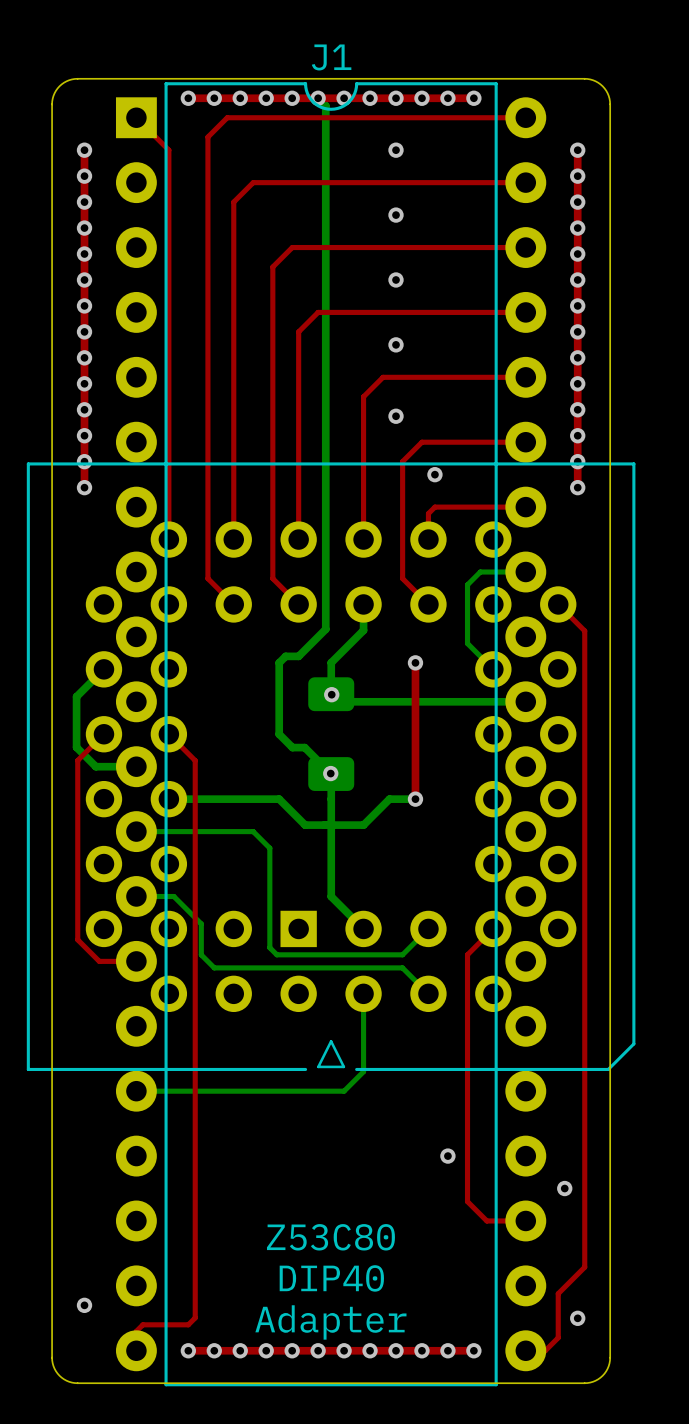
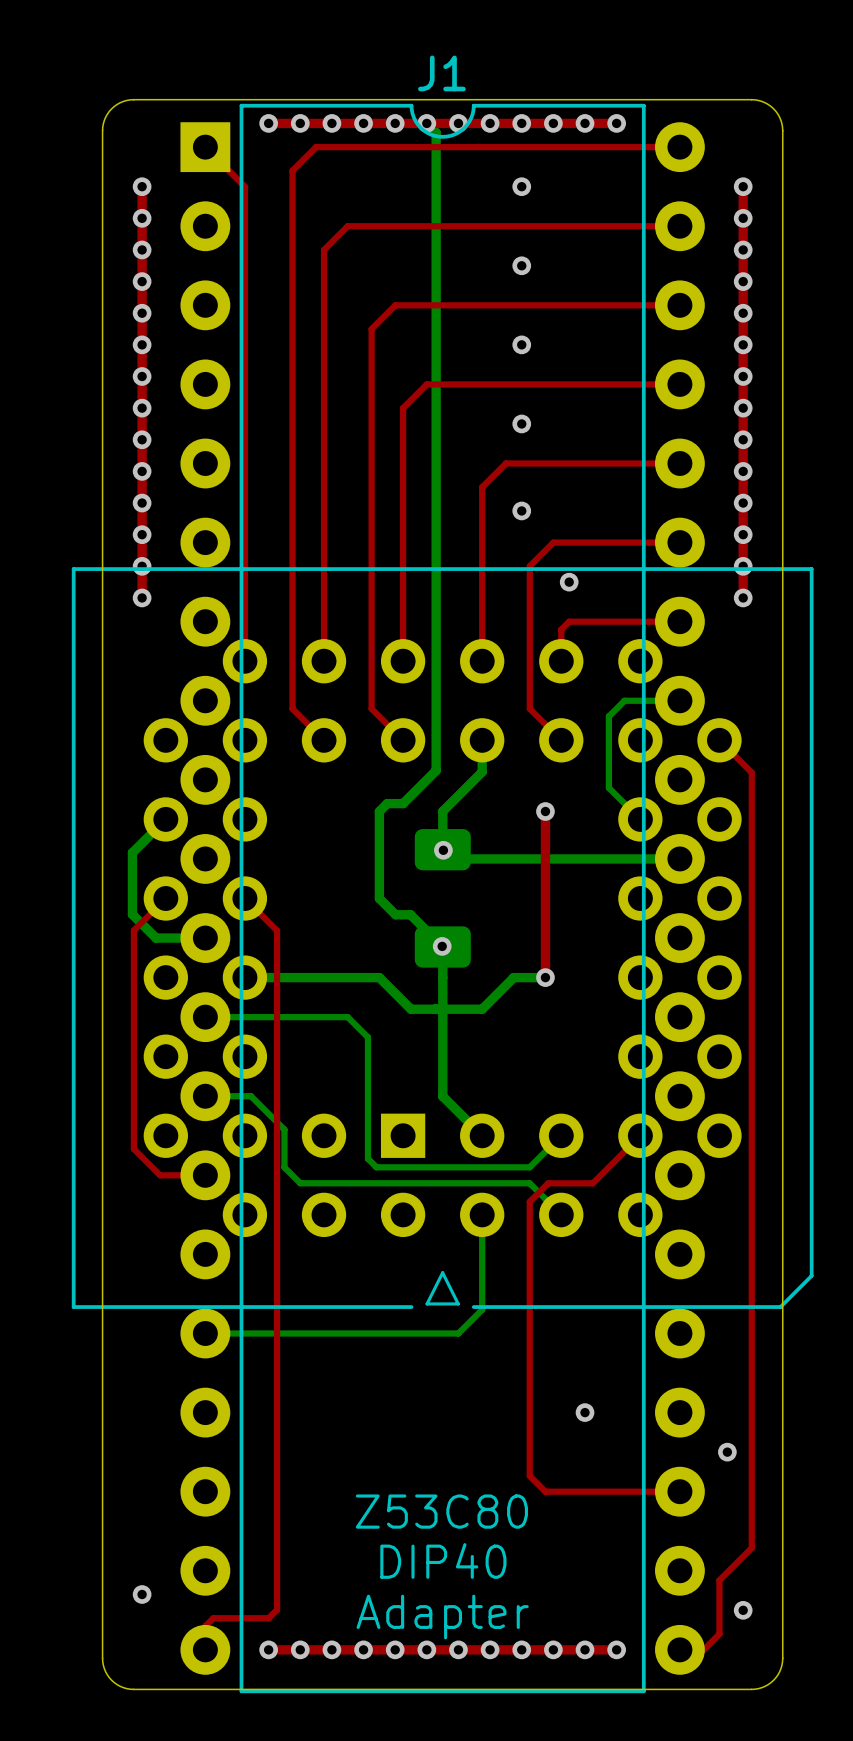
top track: (467, 954) (467, 1201) (486, 1220) -> (608, 1167) (592, 1183) (548, 1183) (529, 1201) (529, 1475) (545, 1491) (632, 1491)

